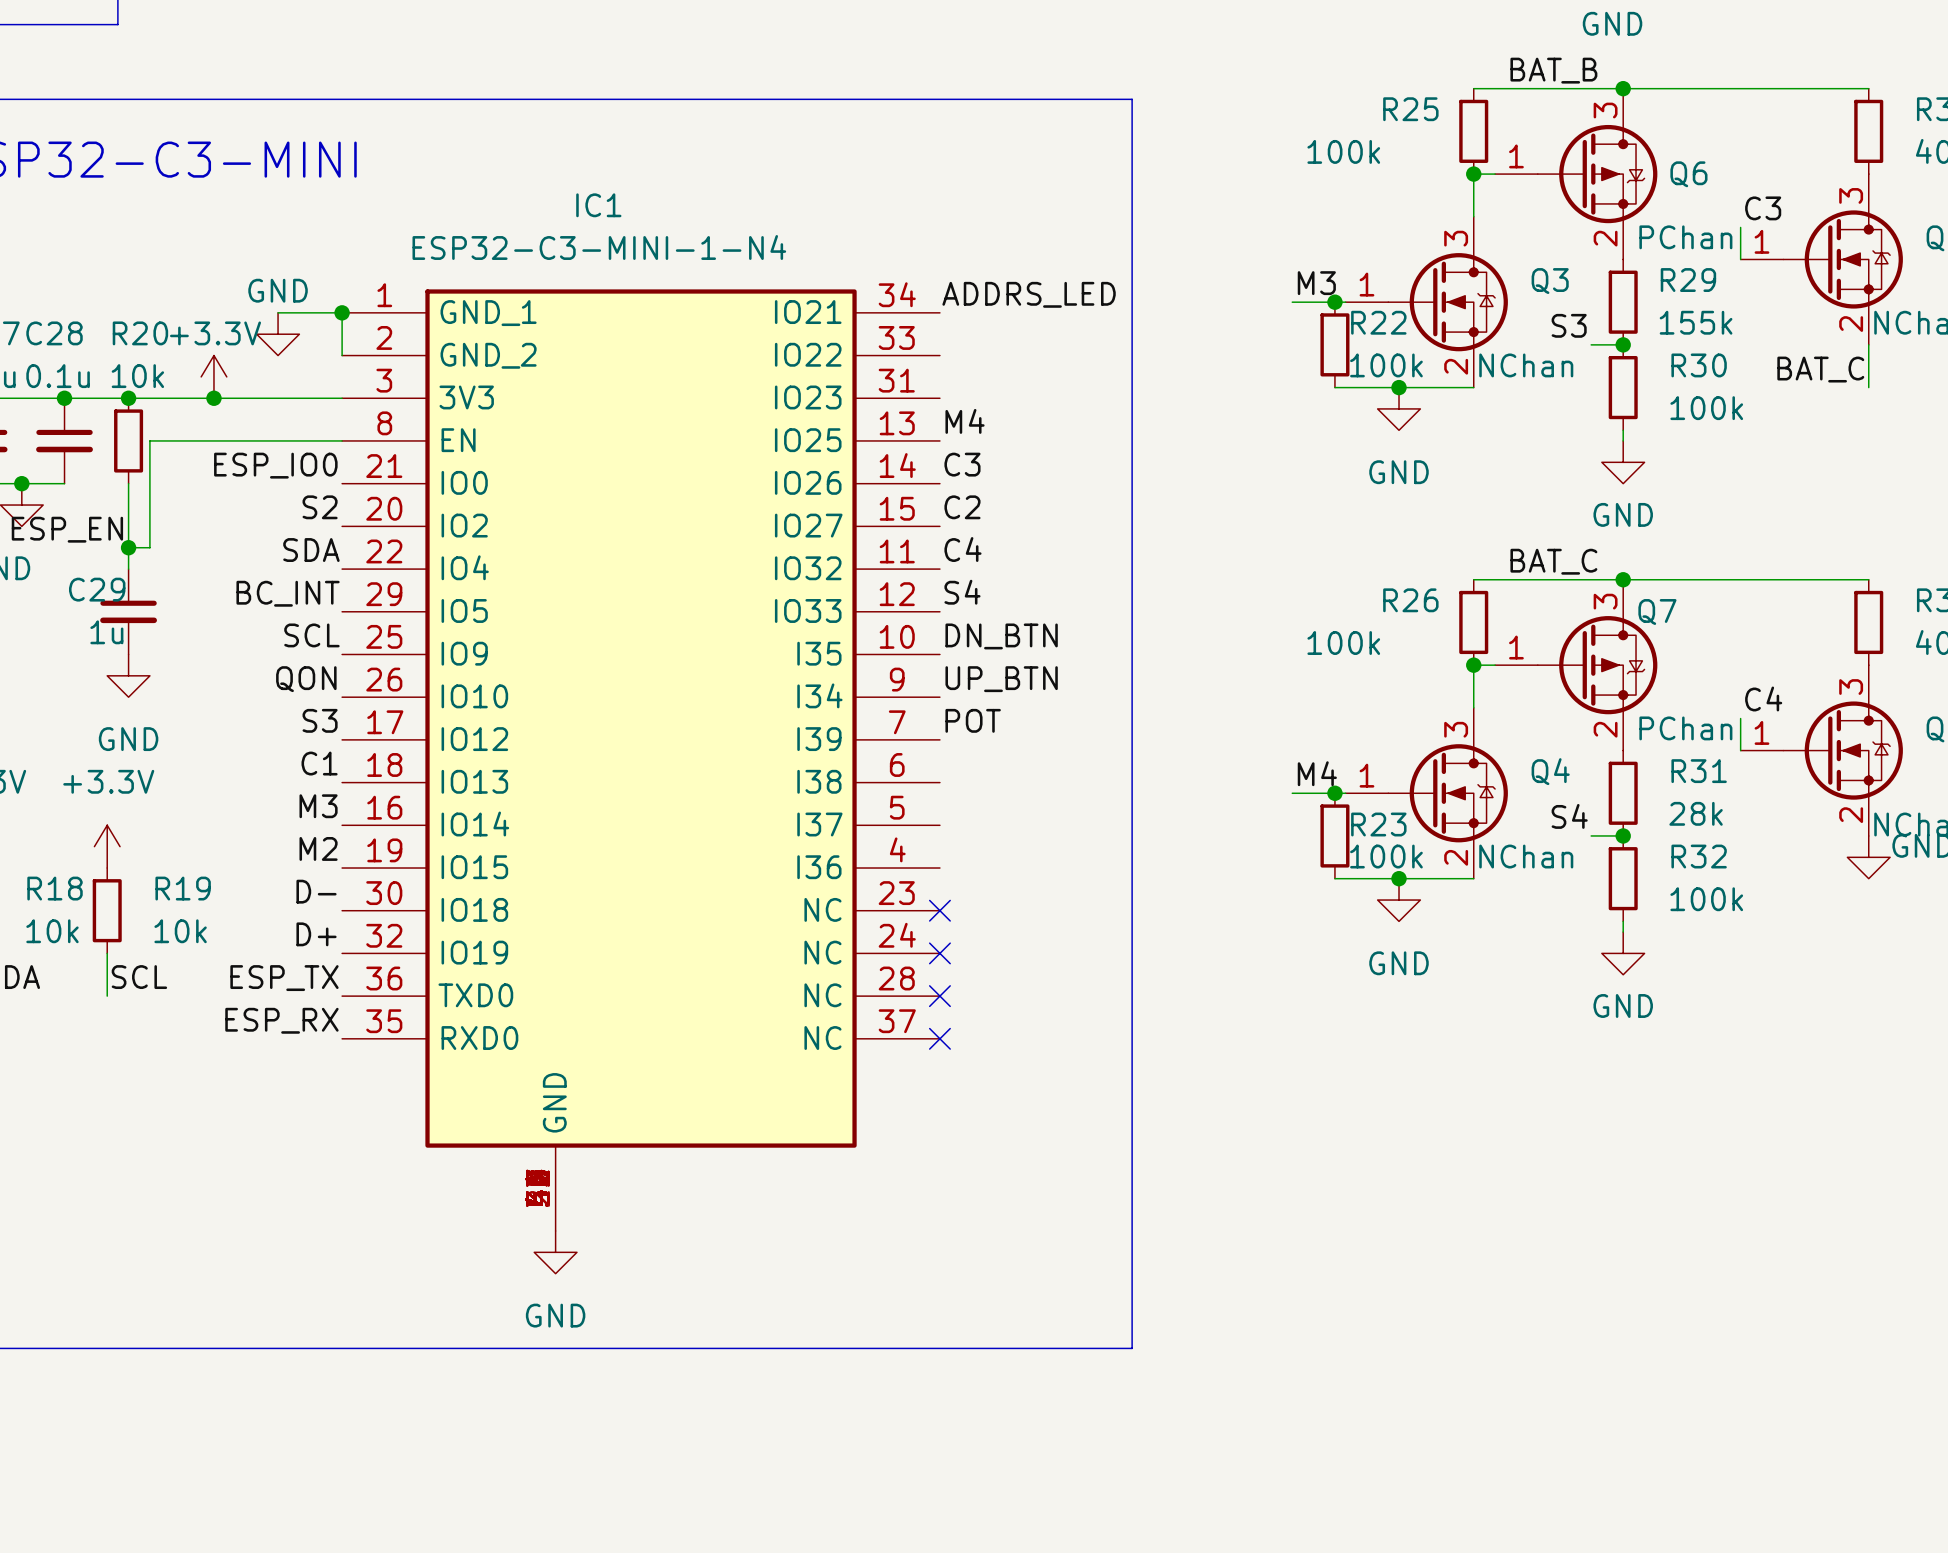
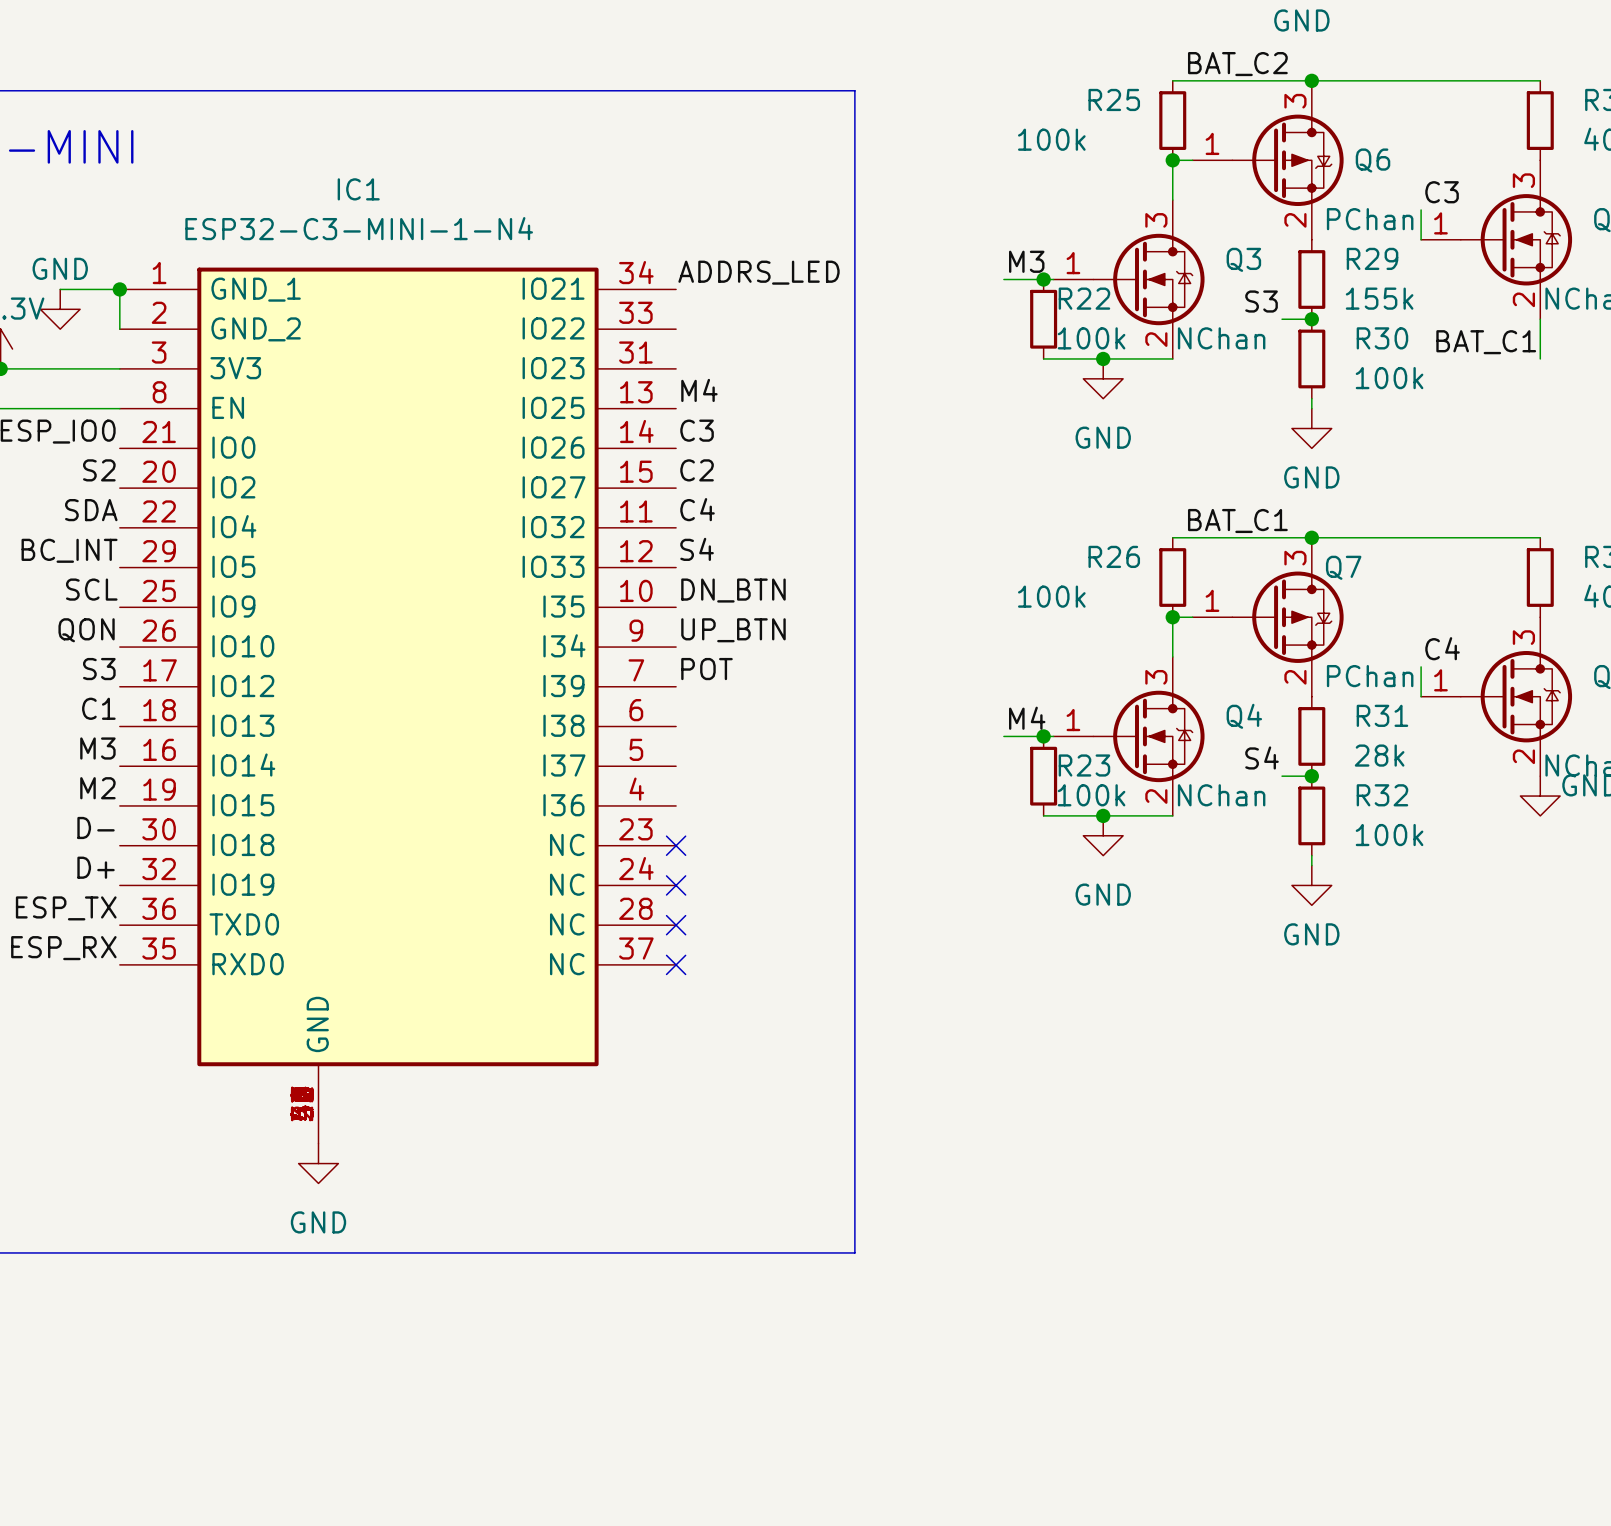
label: BAT_B (1553, 70) -> BAT_C2 (1237, 64)
label: BAT_C (1820, 369) -> BAT_C1 (1486, 342)
label: BAT_C (1553, 561) -> BAT_C1 (1237, 520)

